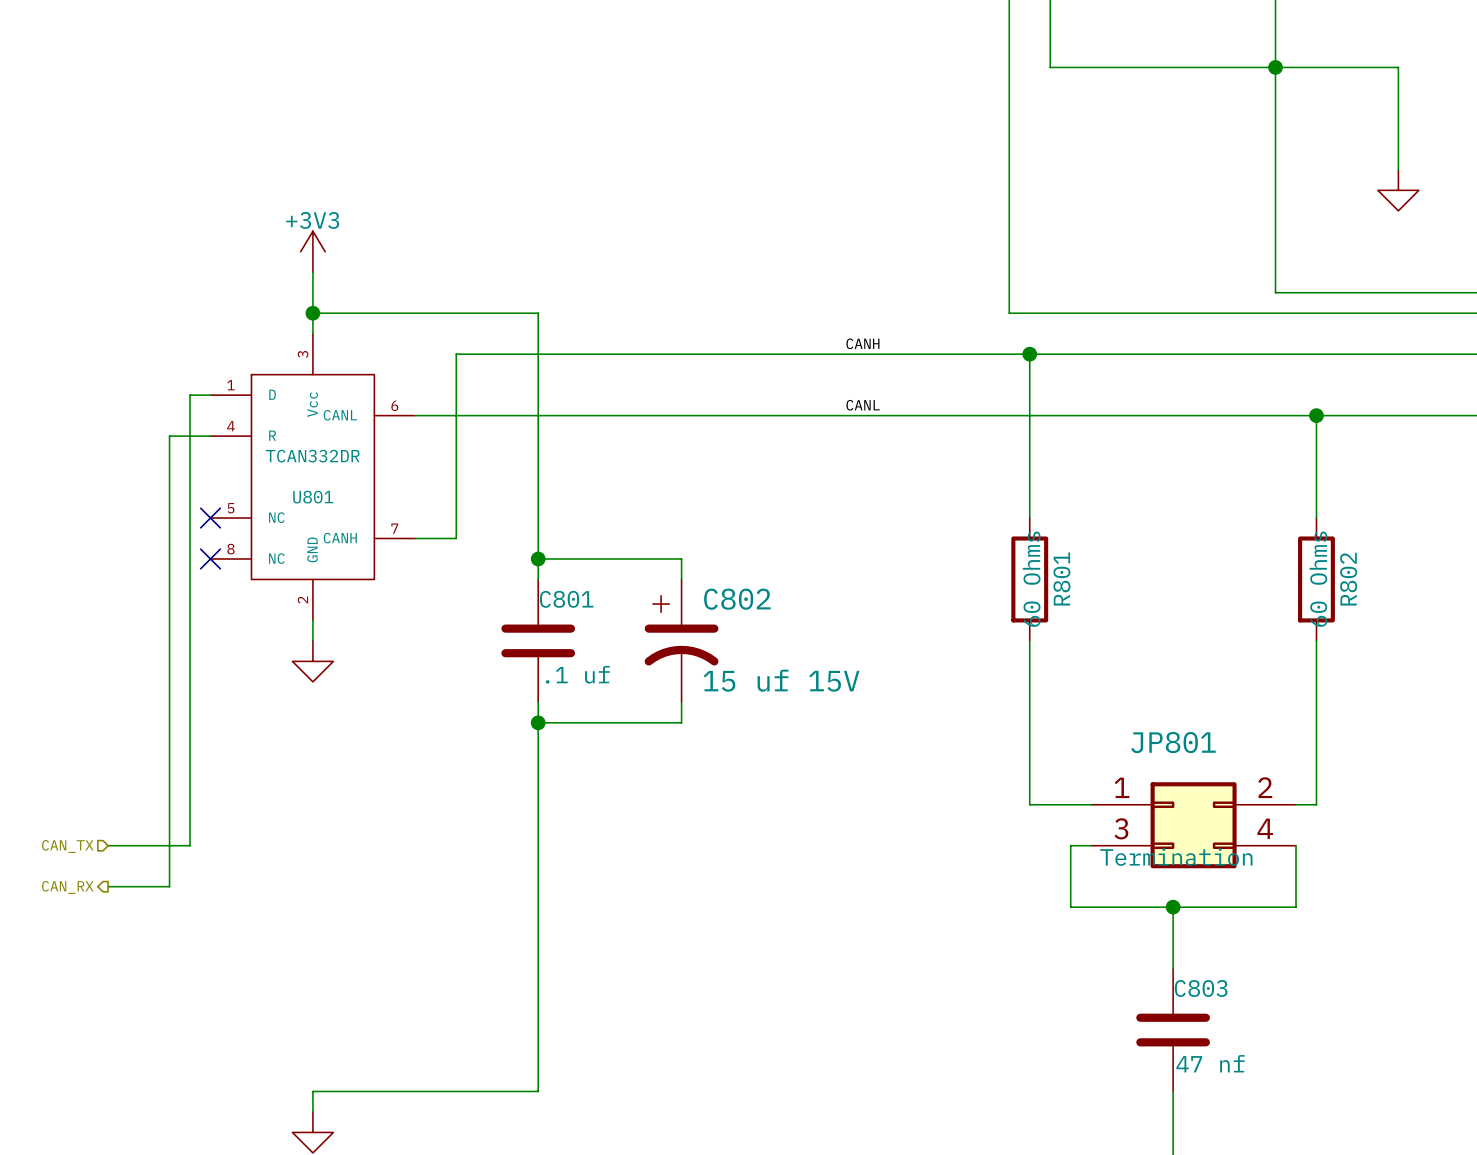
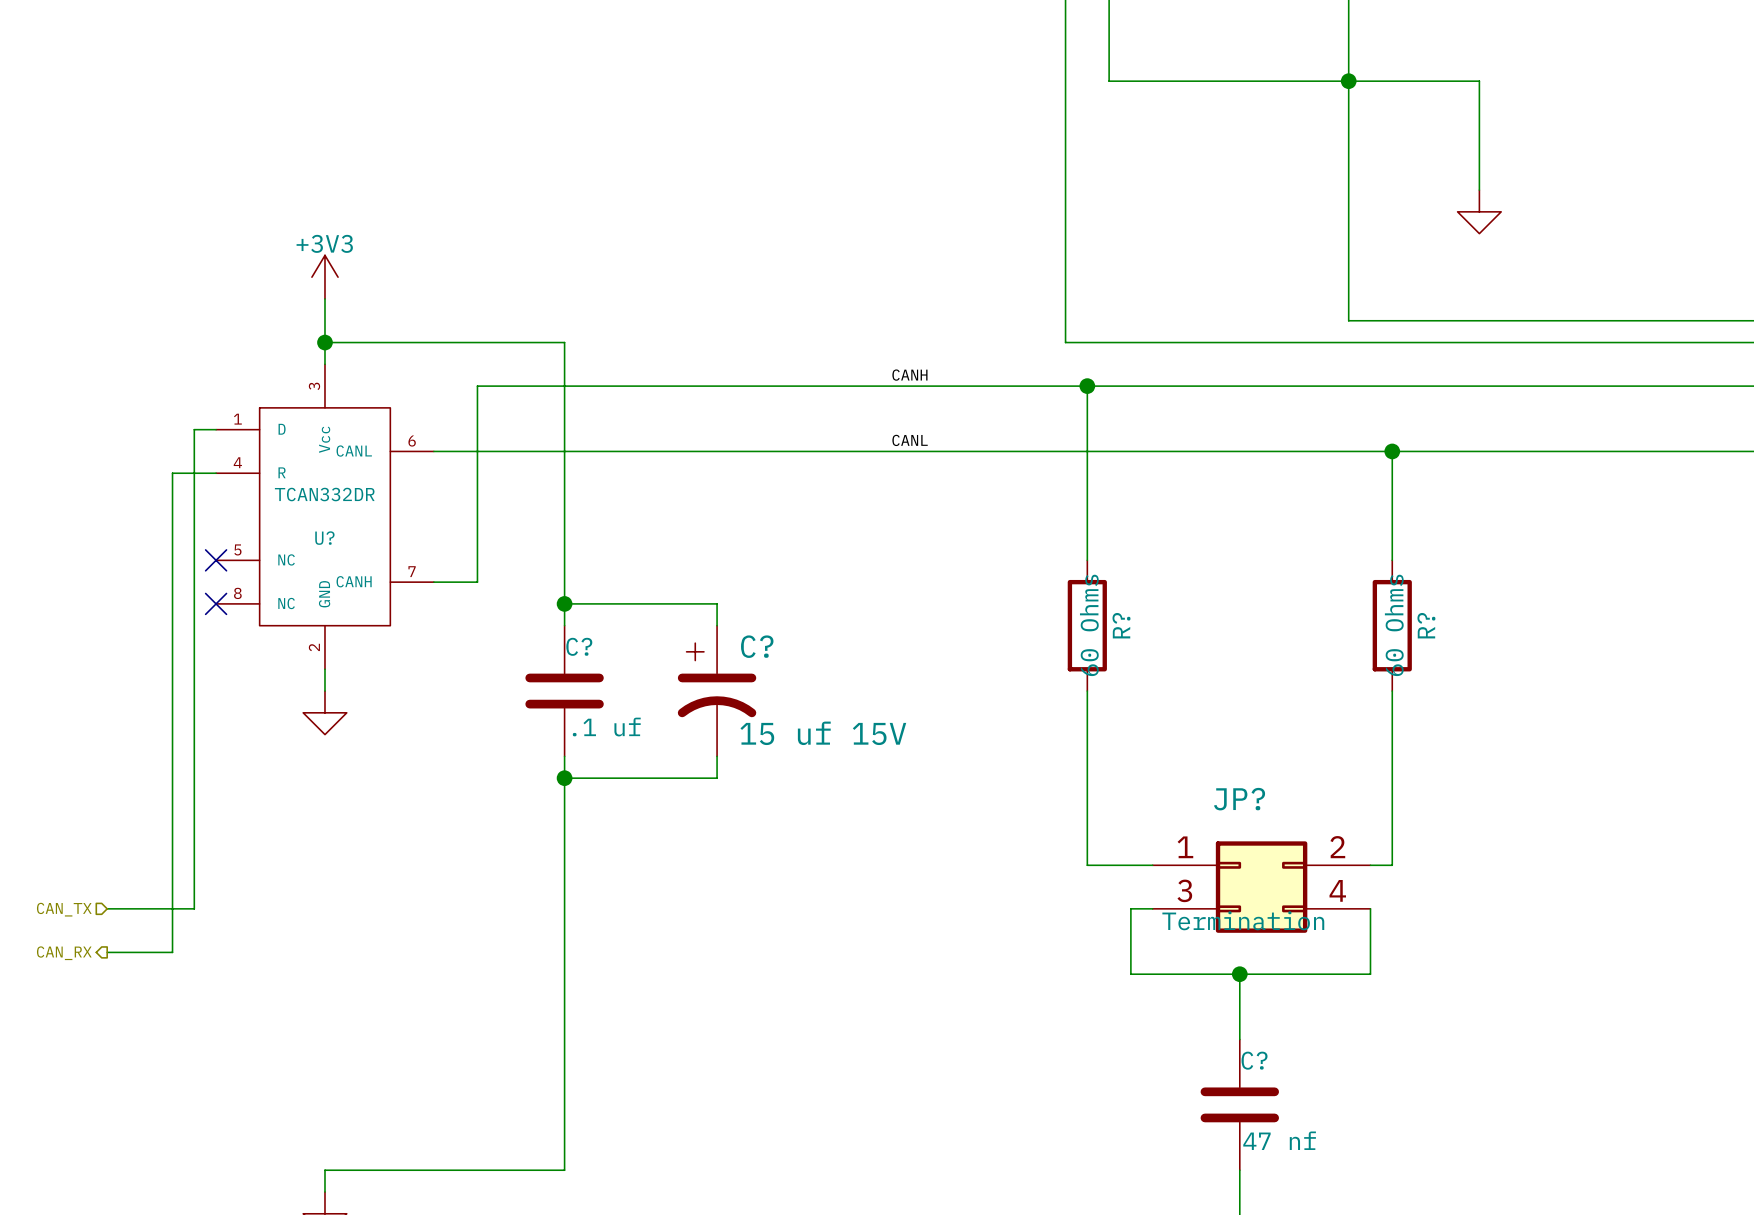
U801 name: U801 (313, 497) -> U? (324, 538)
R801 name: R801 (1061, 578) -> R? (1121, 625)
R802 name: R802 (1348, 579) -> R? (1426, 625)
C801 name: C801 (566, 599) -> C? (579, 646)
C802 name: C802 (737, 599) -> C? (757, 646)
JP801 name: JP801 (1173, 742) -> JP? (1239, 799)
C803 name: C803 (1201, 988) -> C? (1254, 1060)

